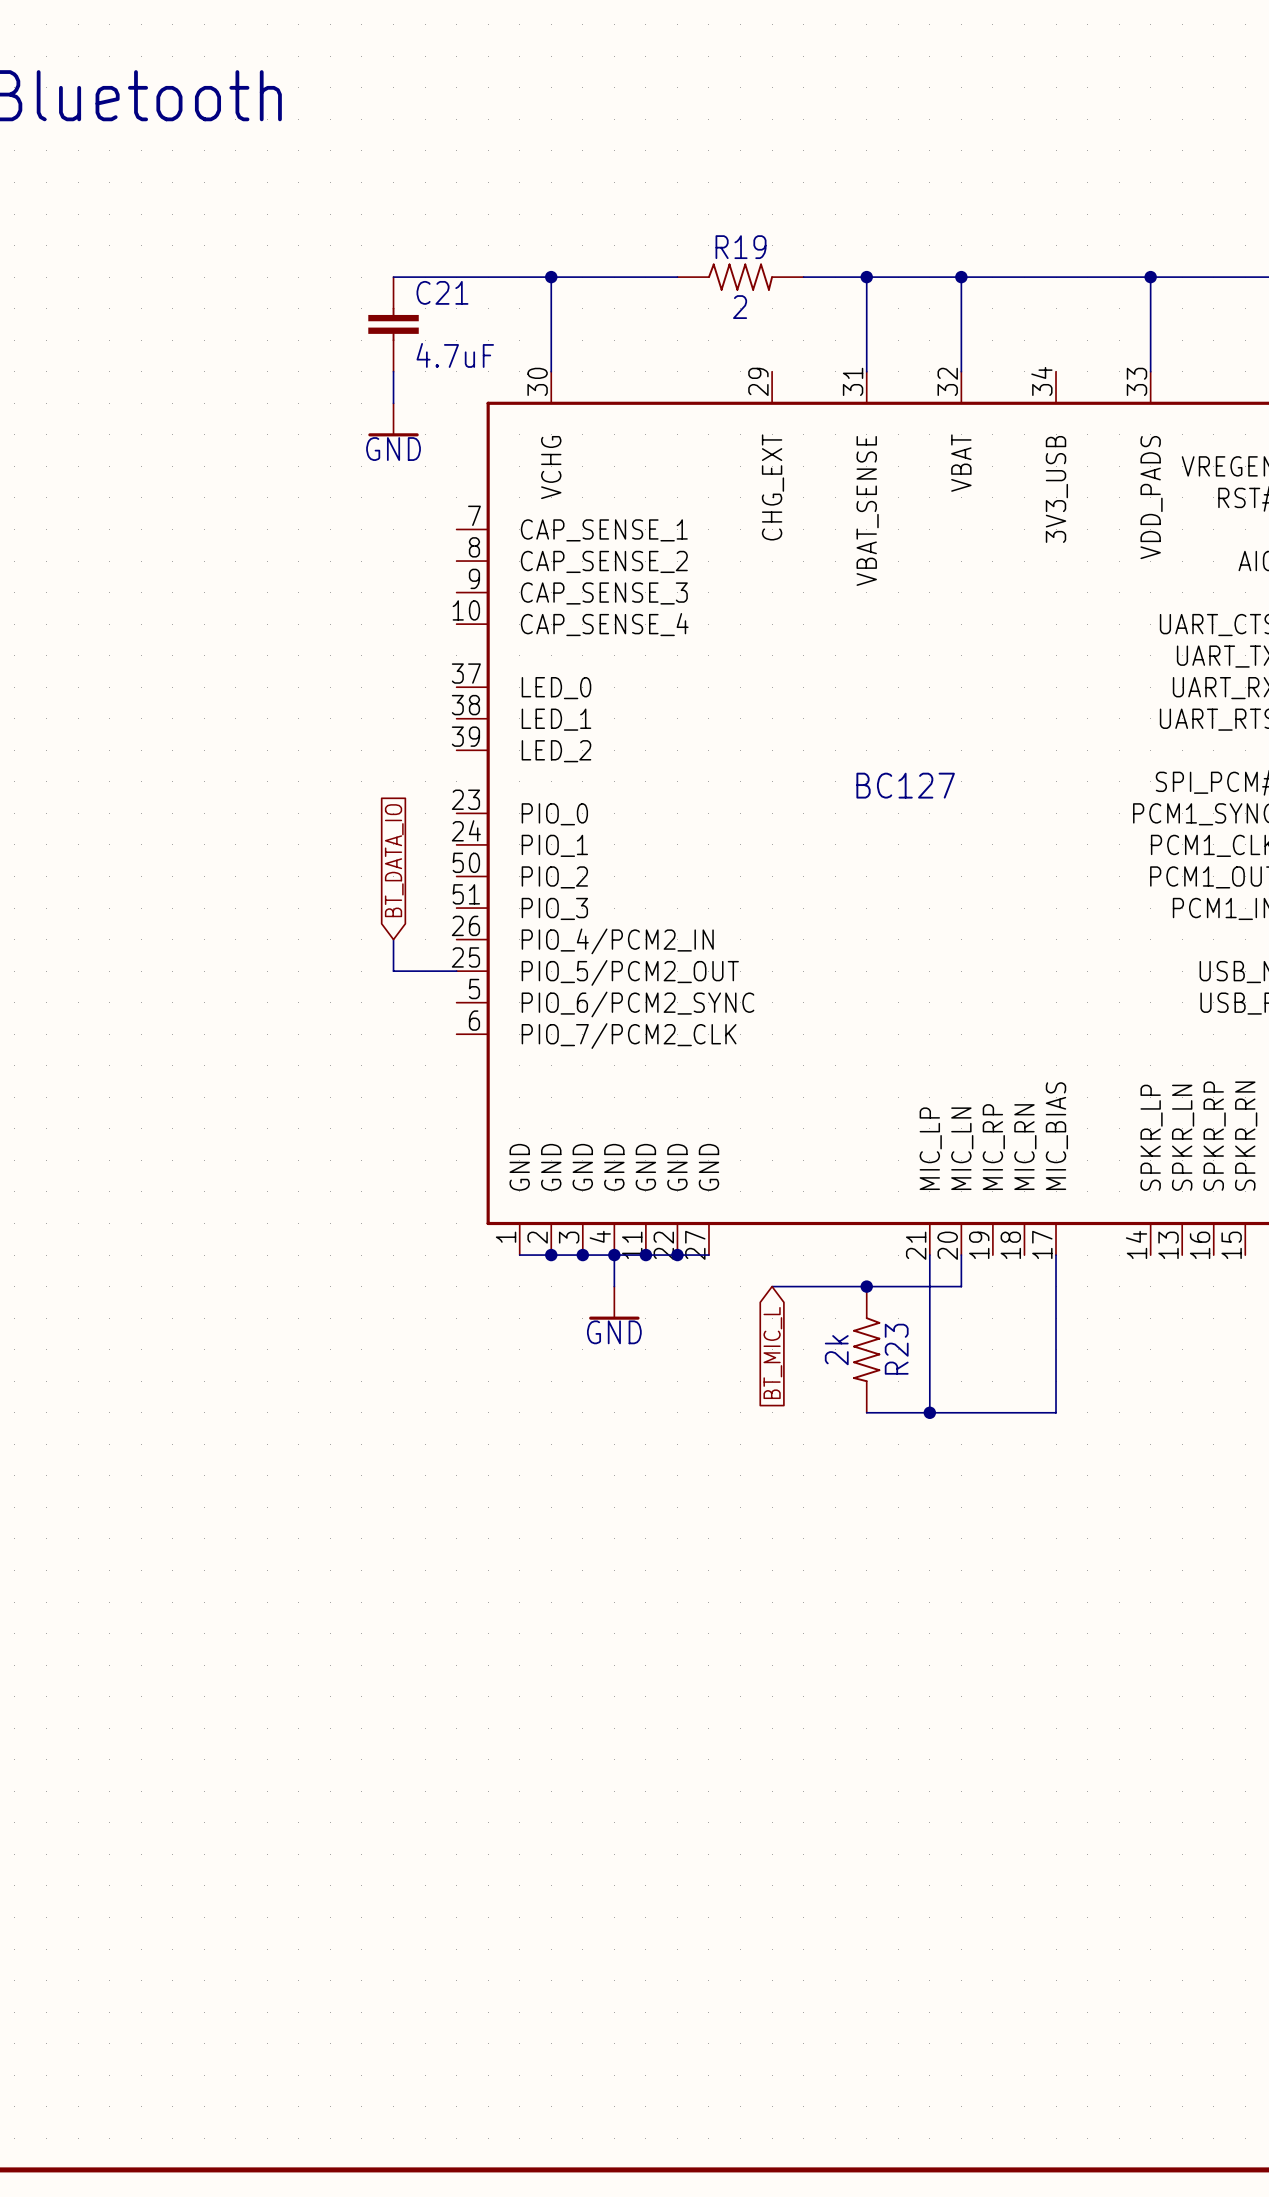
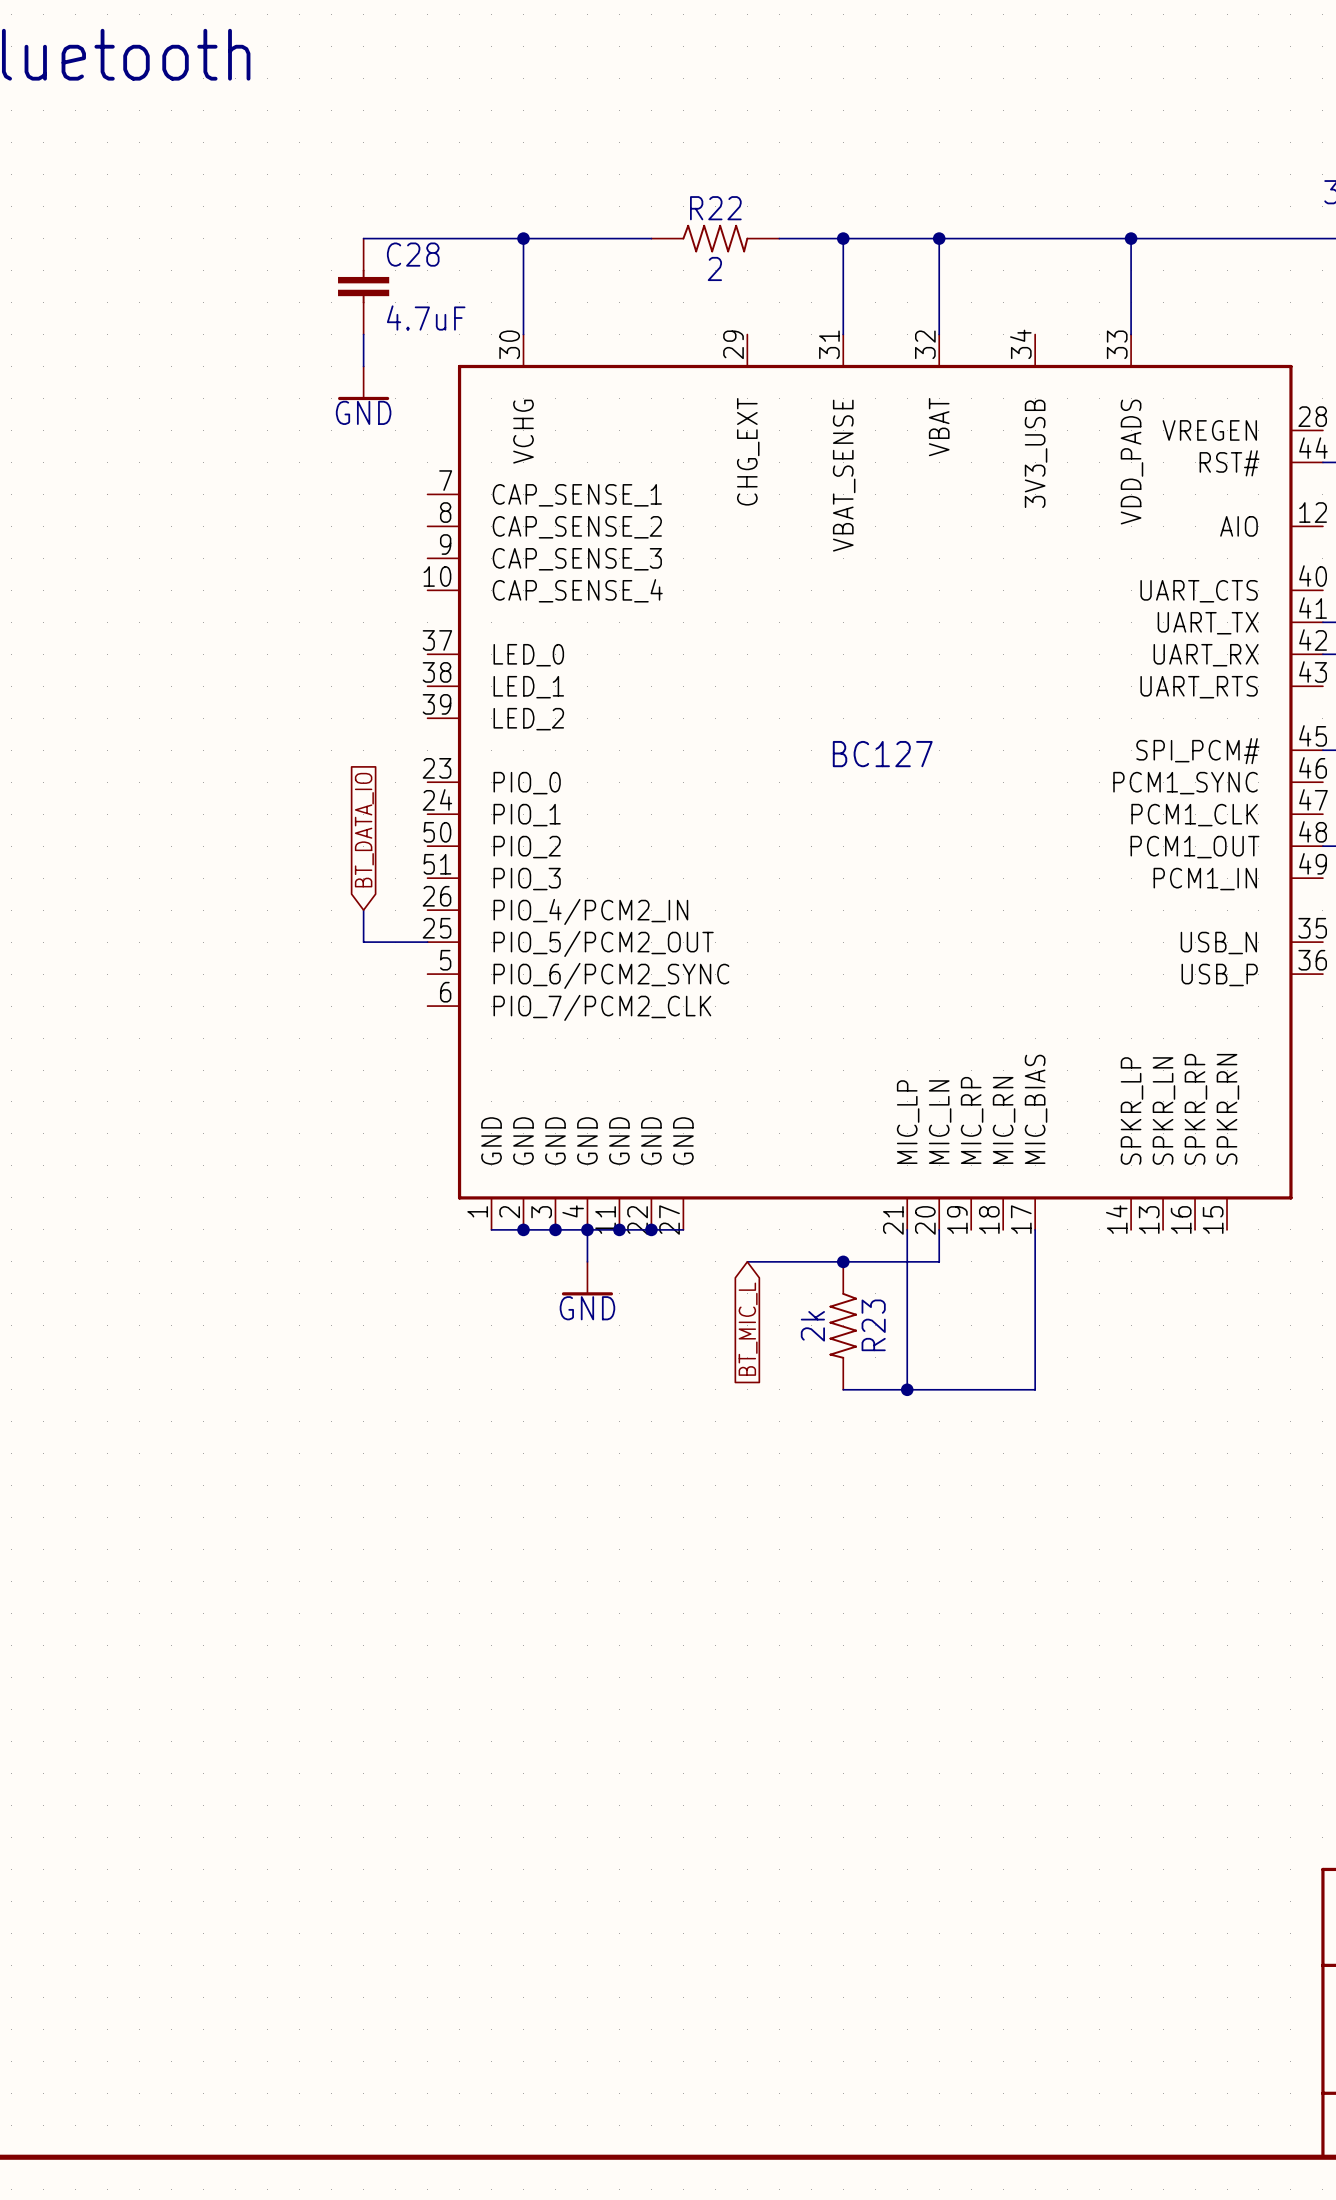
R19 name: R19 (741, 247) -> R22 (715, 208)
C21 name: C21 (442, 292) -> C28 (413, 254)

